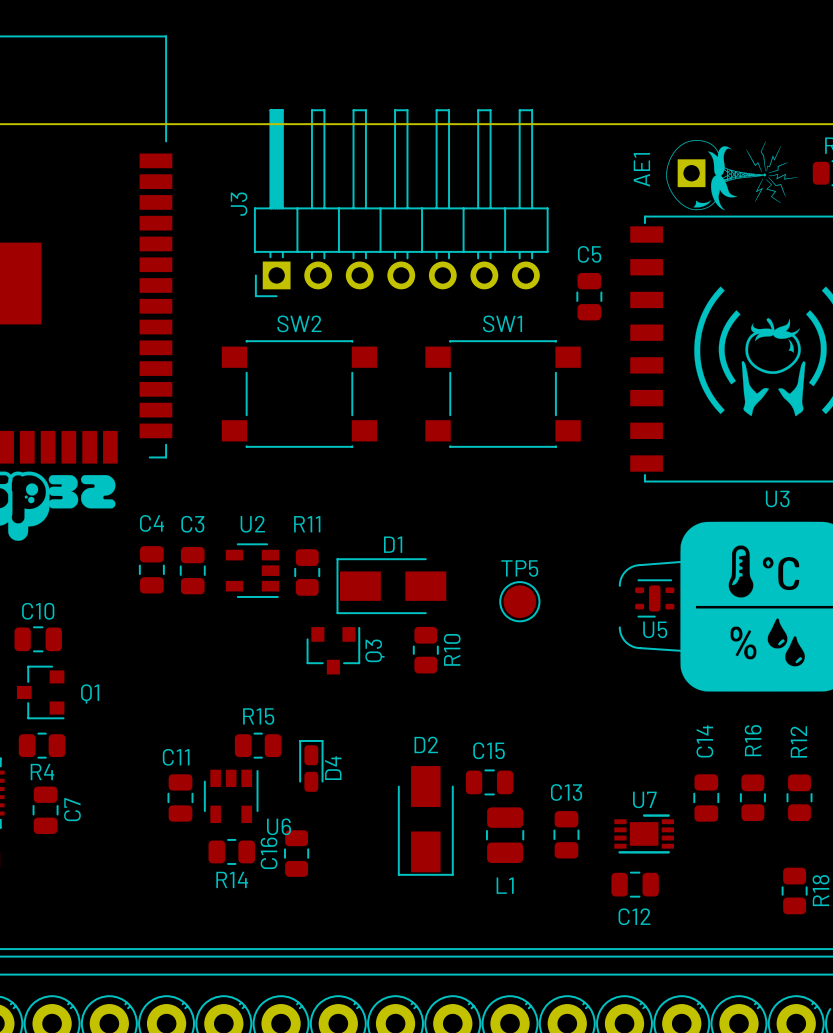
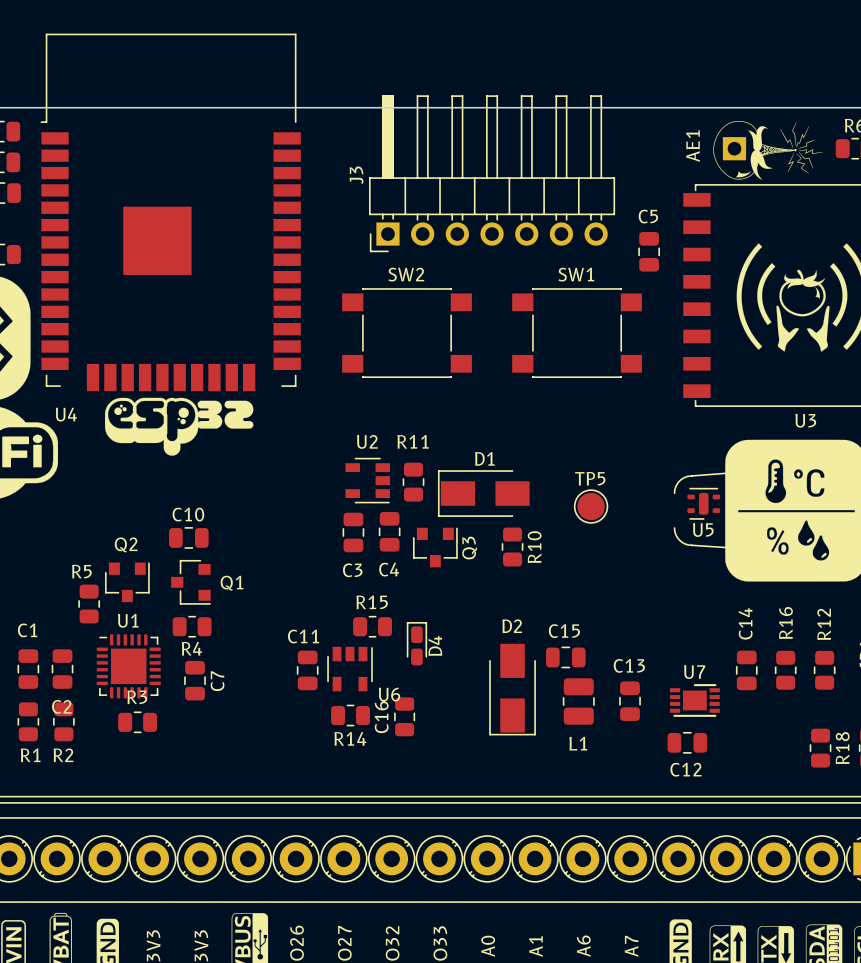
C4 name position: C4 (151, 523) -> C4 (389, 569)
C3 name position: C3 (192, 524) -> C3 (352, 570)
C4 position: (151, 569) -> (389, 531)
C3 position: (192, 570) -> (353, 532)

